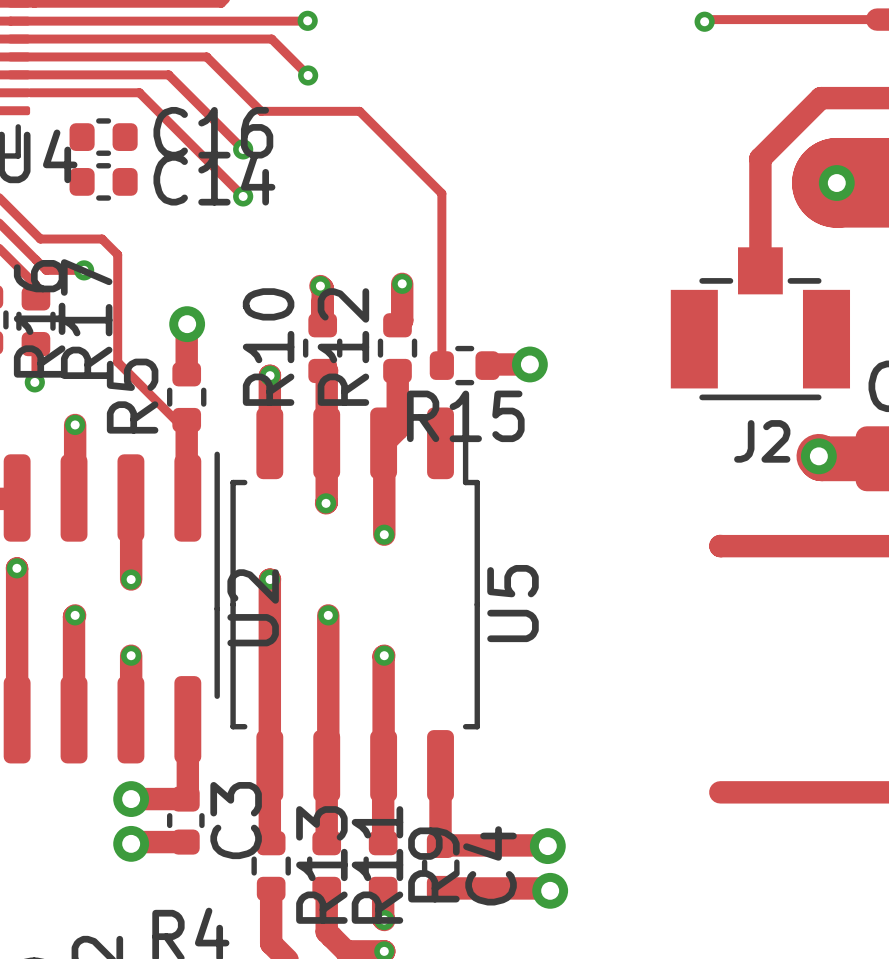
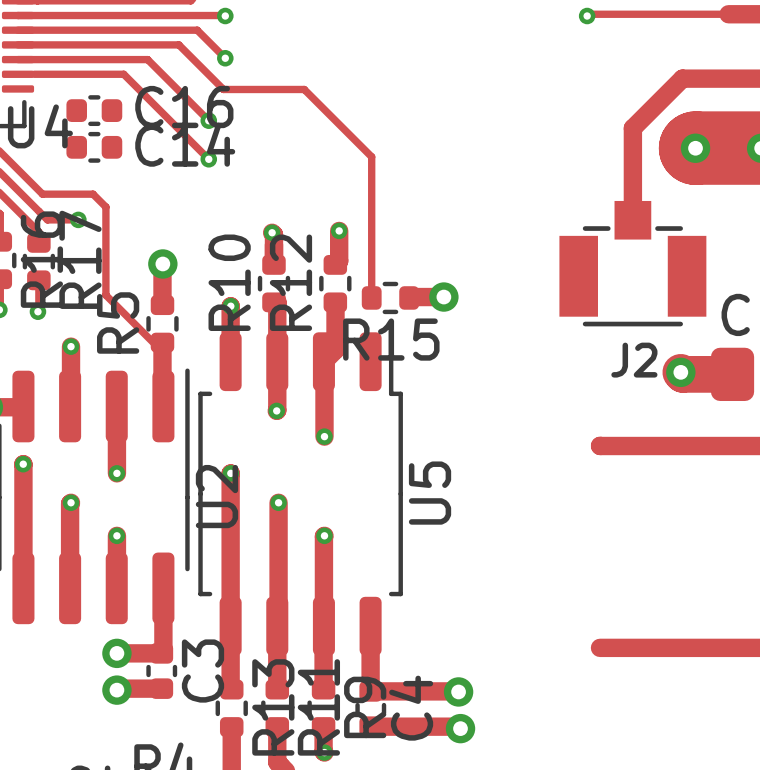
via: (307, 20) -> none
track: (262, 21) (307, 21) -> none
via: none -> (225, 16)
track: (229, 39) (271, 39) (308, 75) -> (197, 30) (225, 58)
via: none -> (225, 58)
via: (308, 75) -> none

